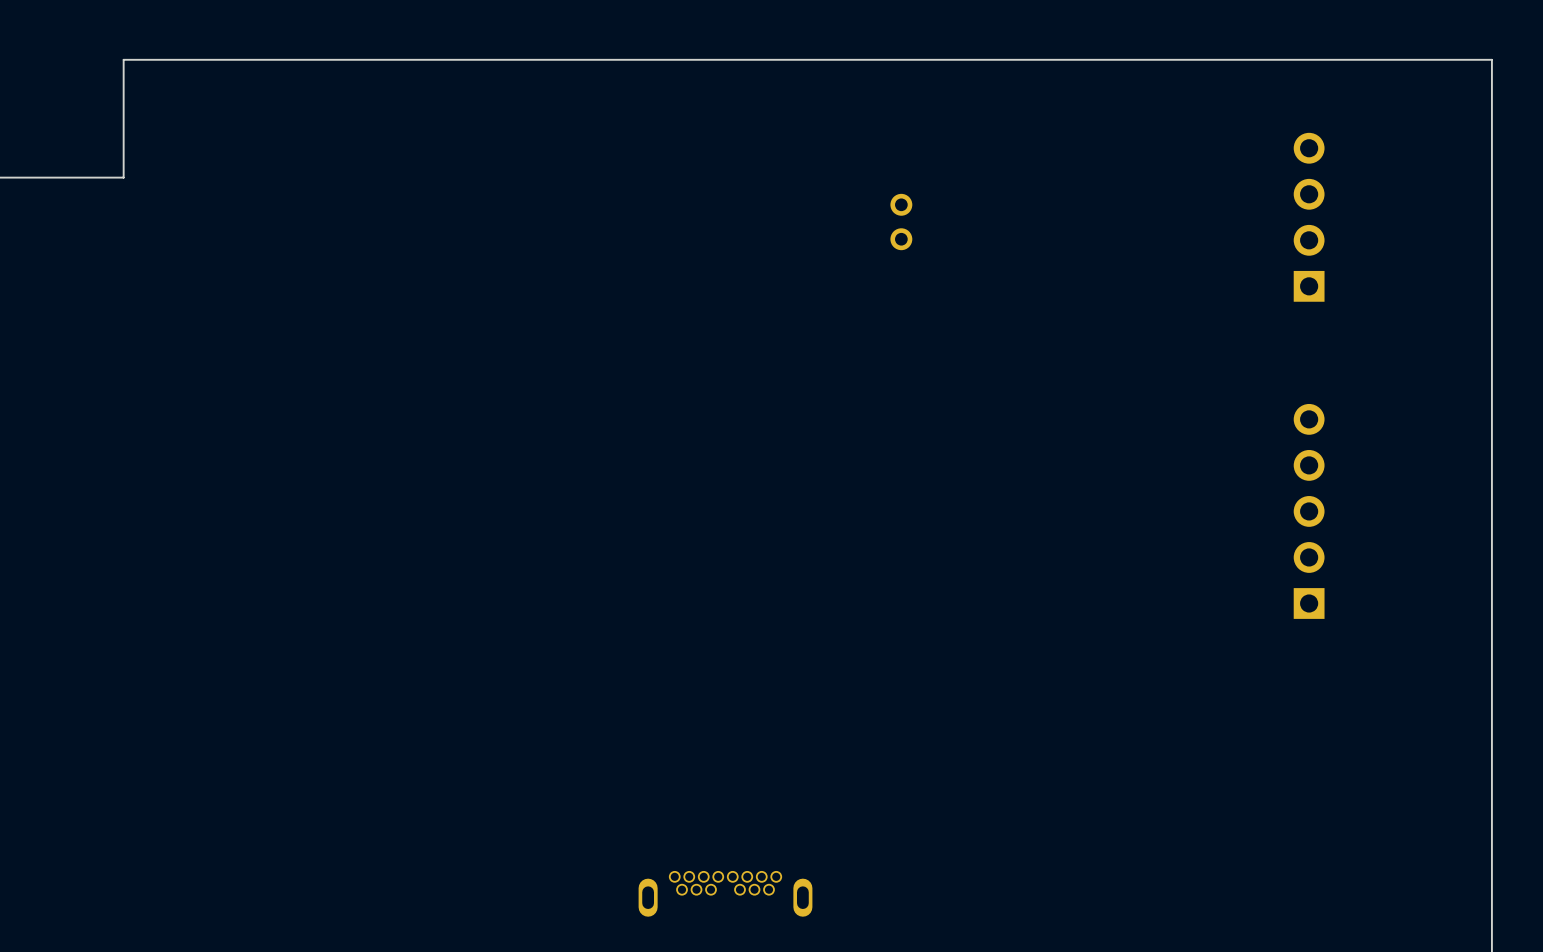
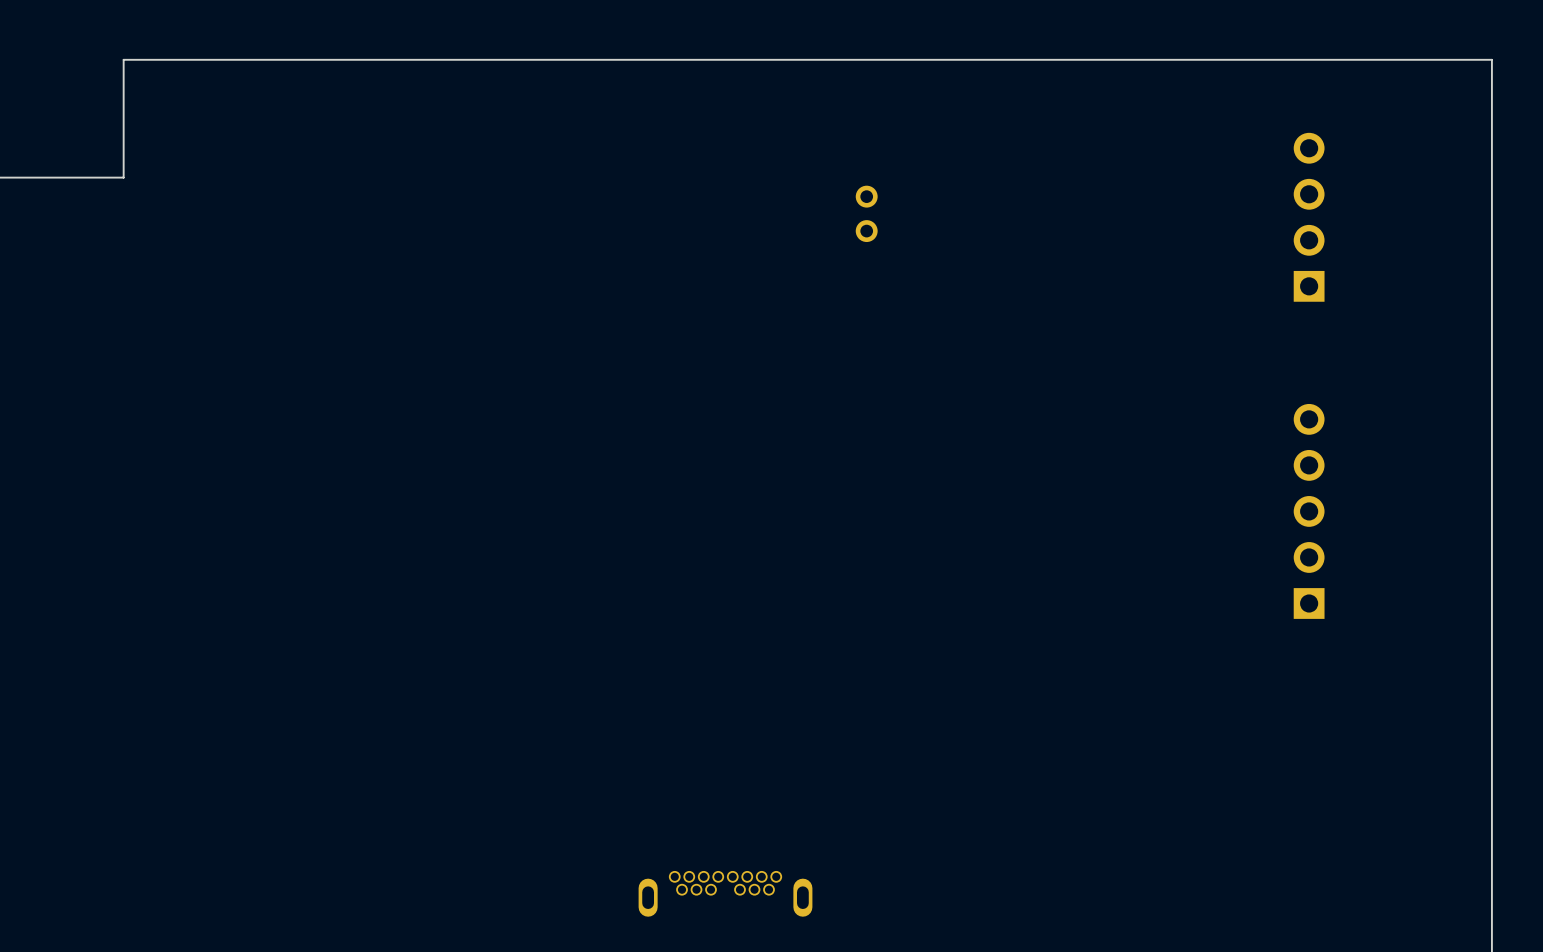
part position: (901, 222) -> (866, 213)

